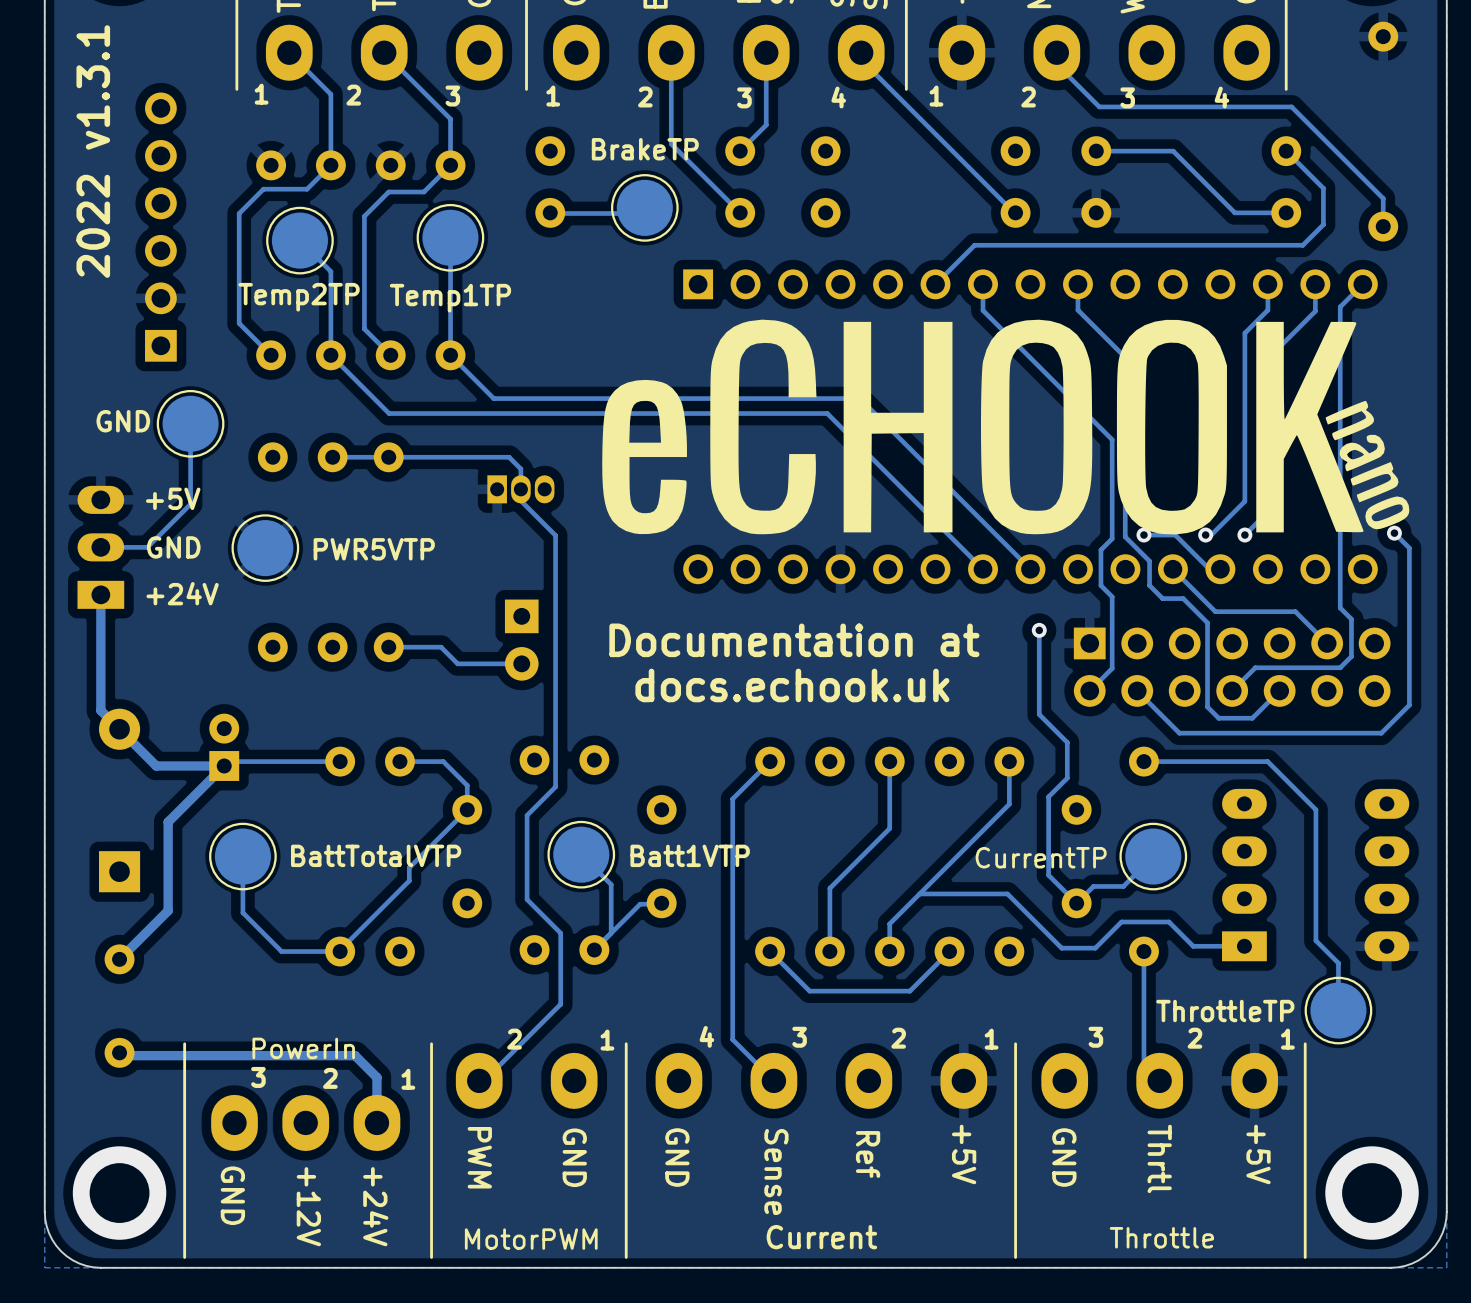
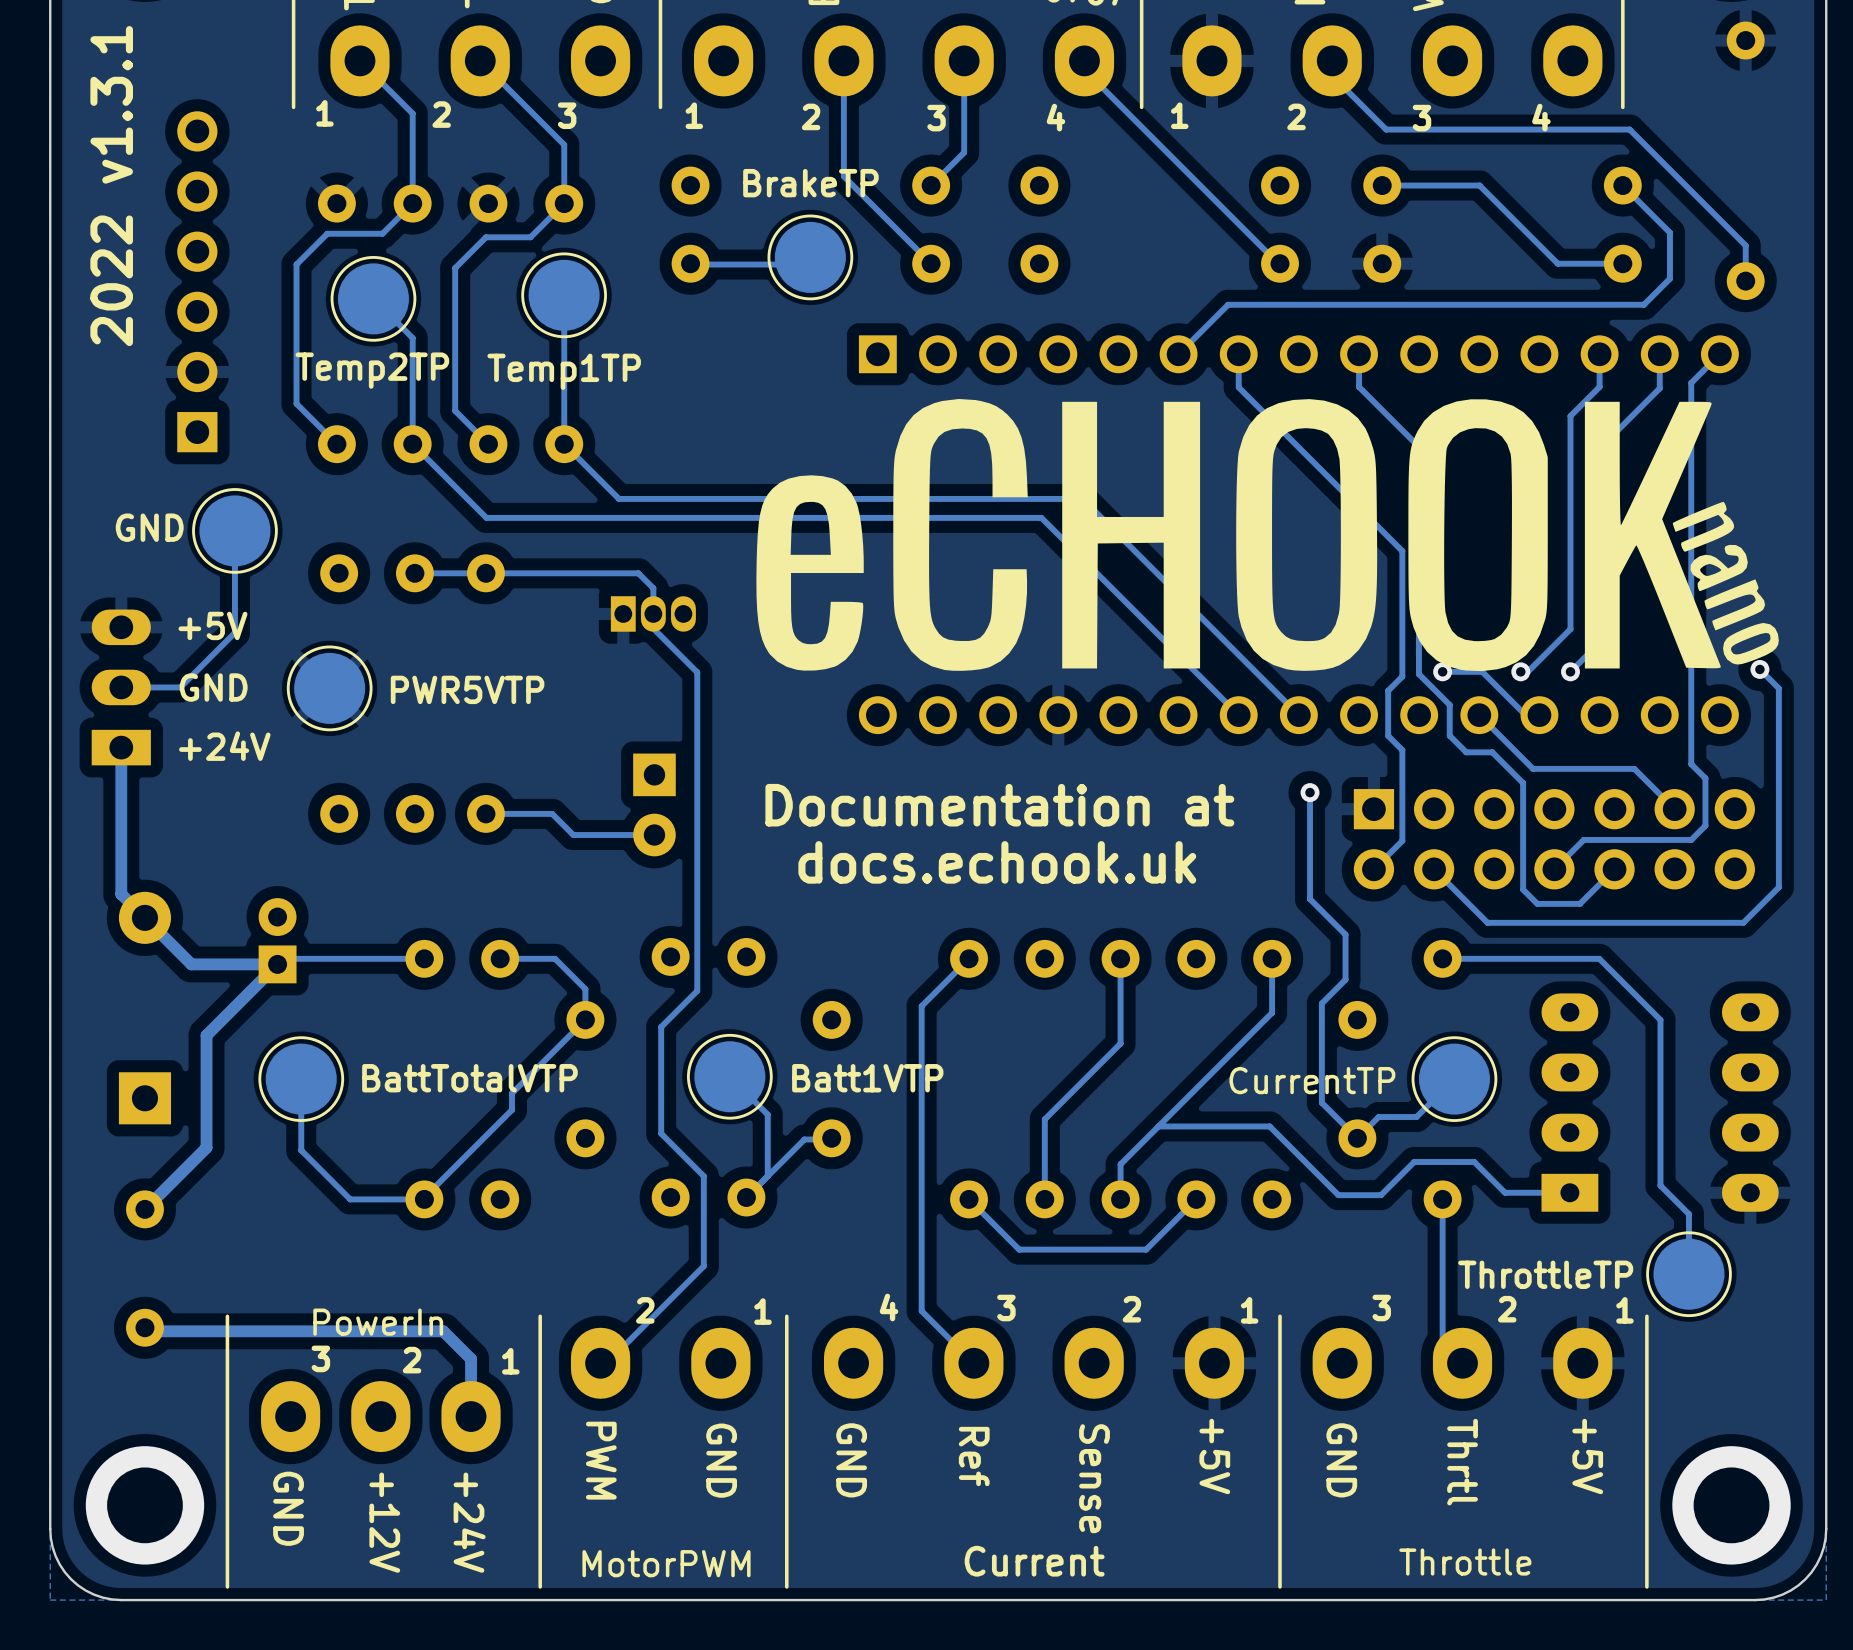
text position: Ref (868, 1154) -> Ref (974, 1456)
text position: Sense (776, 1171) -> Sense (1094, 1478)

